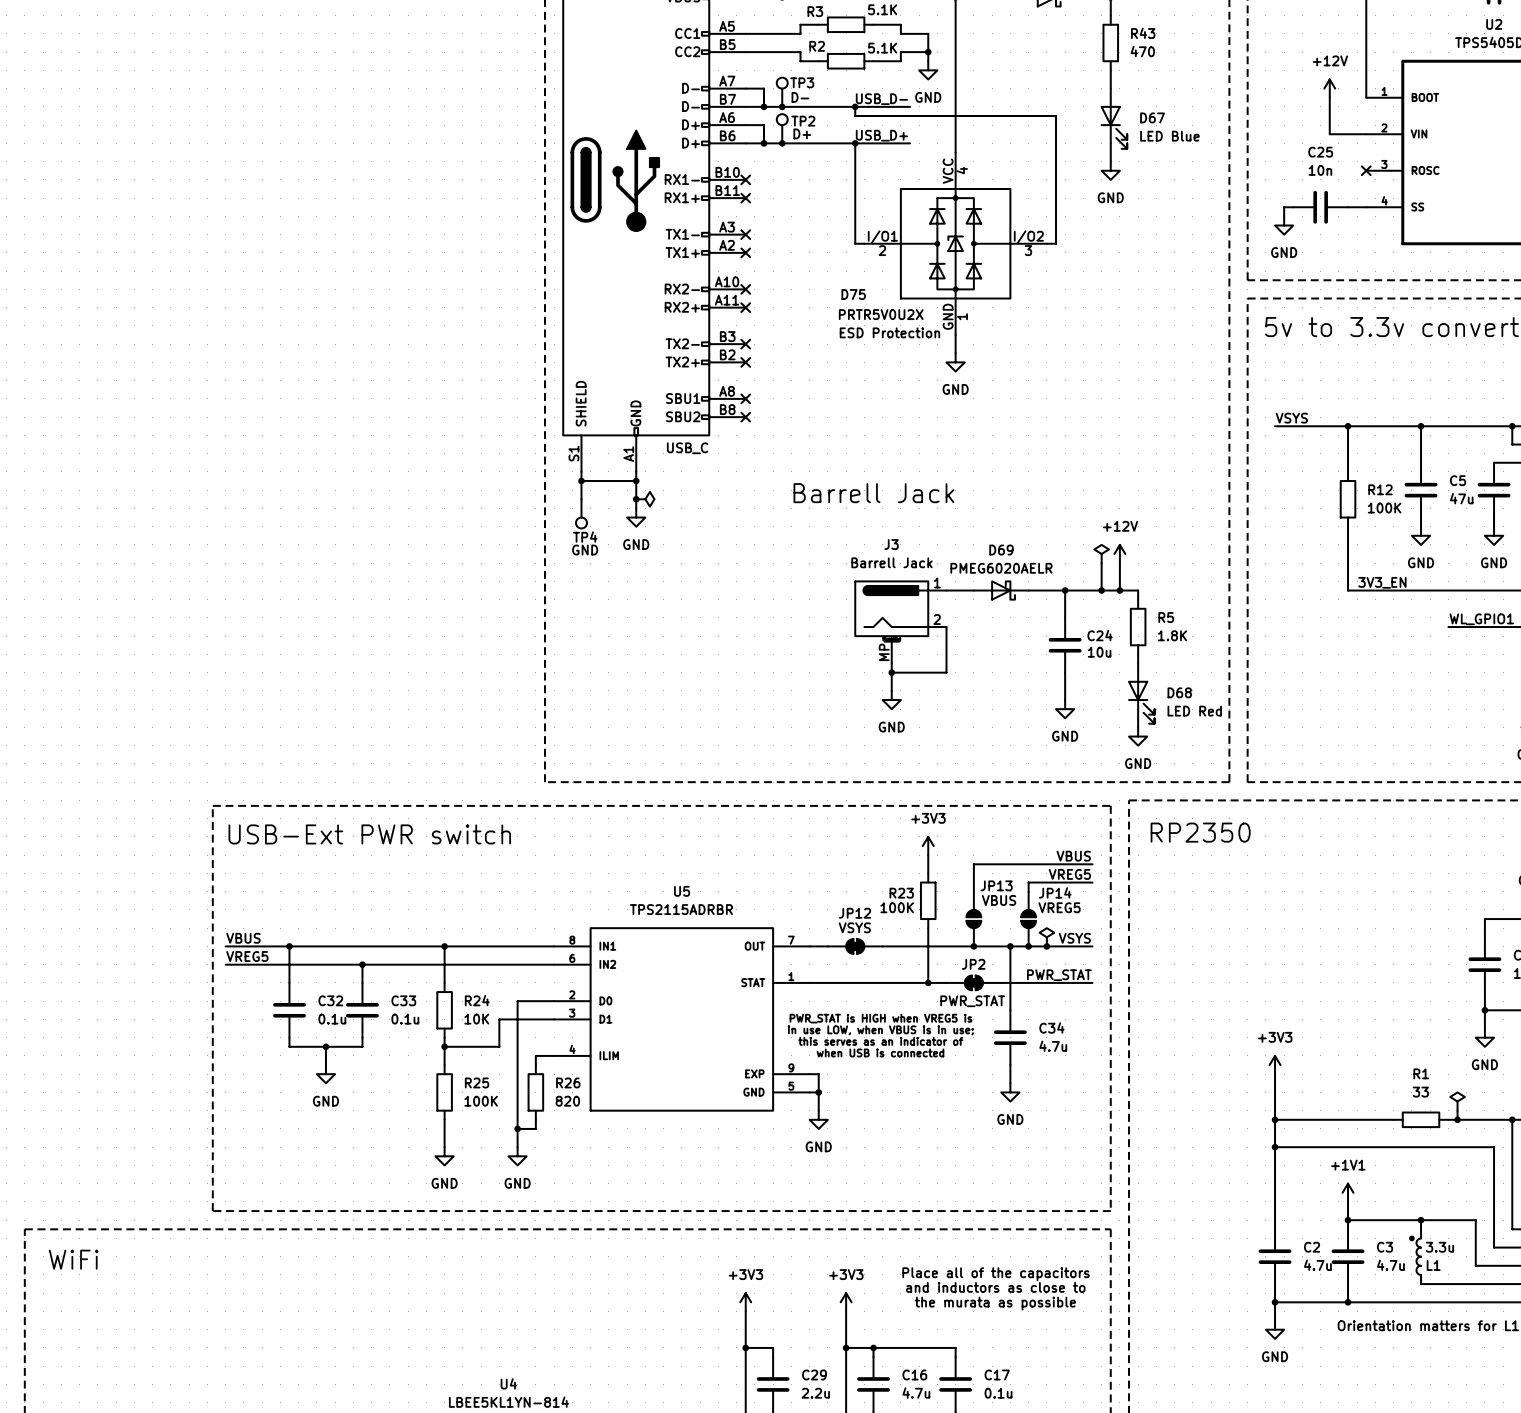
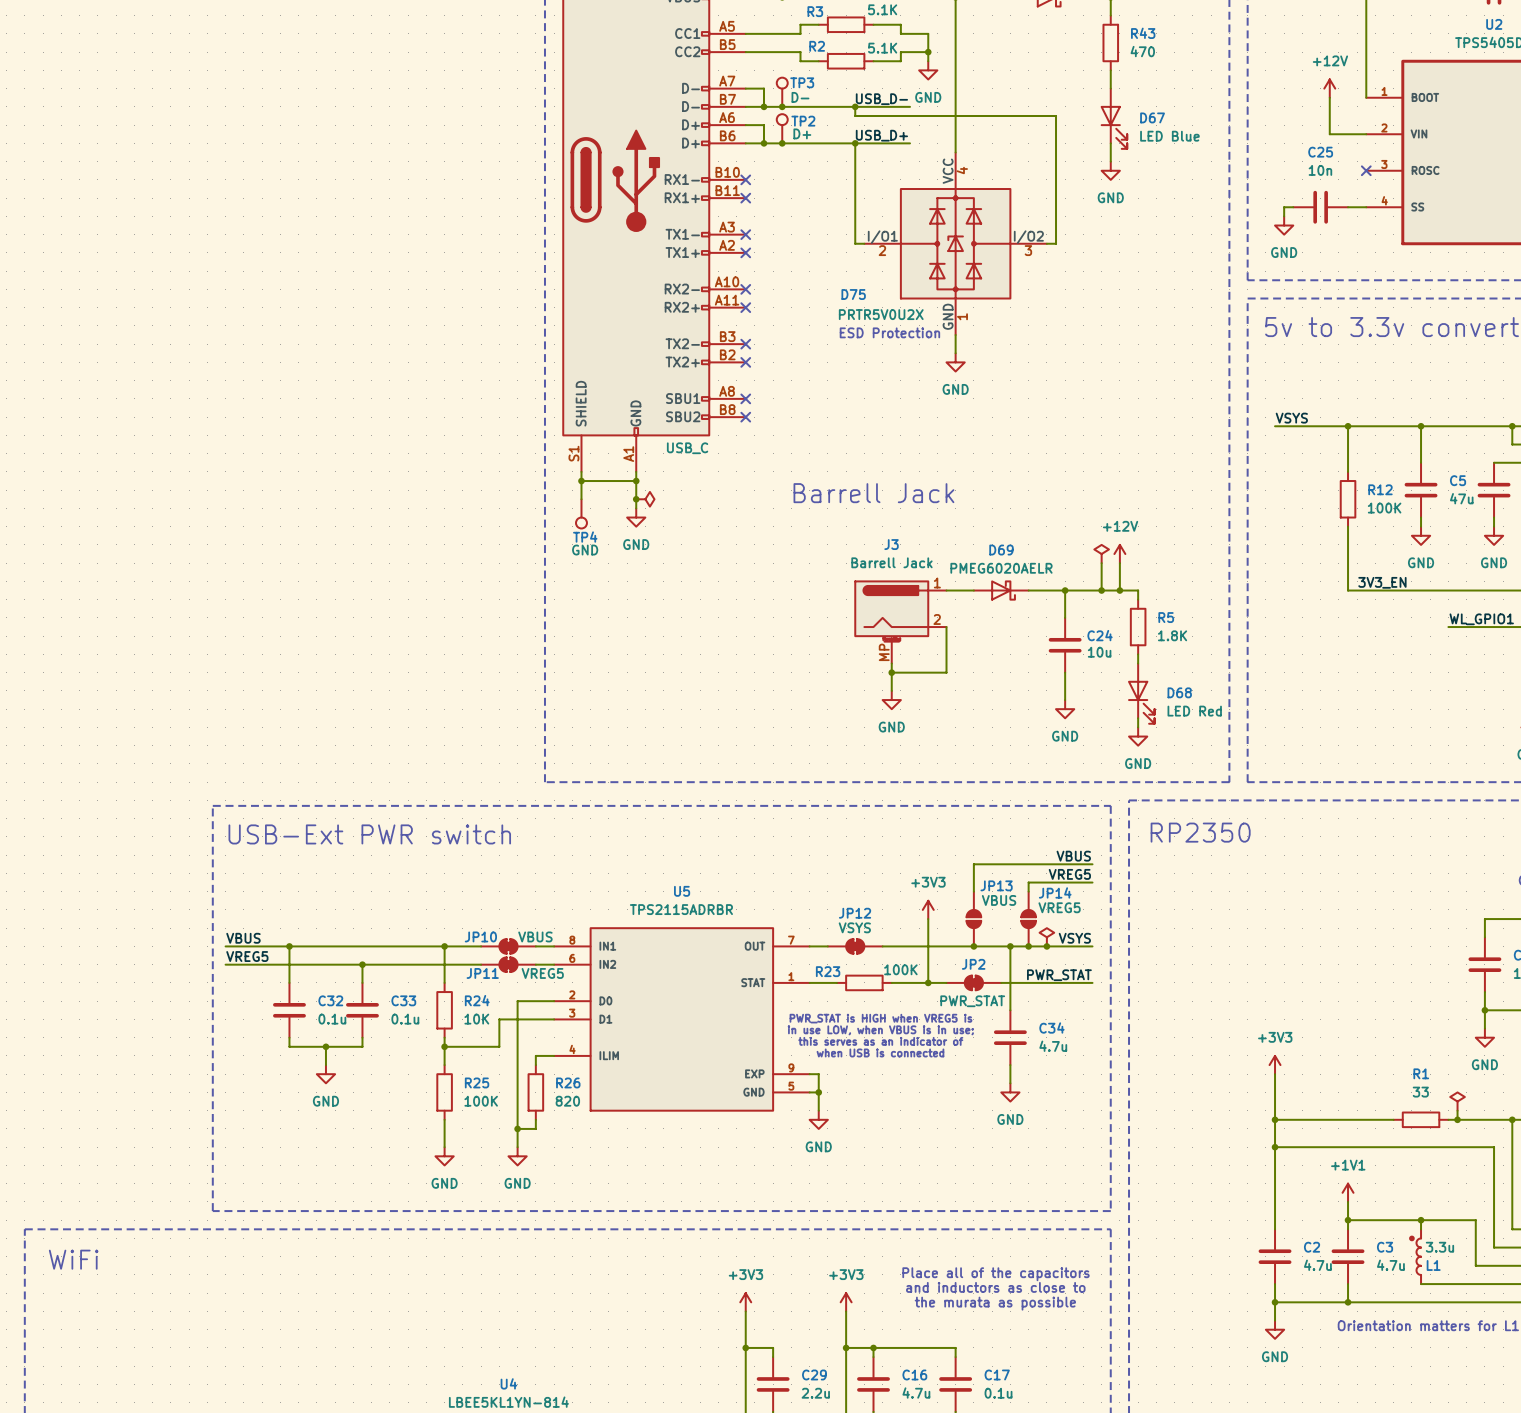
power symbol position: +3V3 (928, 846) -> +3V3 (928, 909)
wire: (928, 855) (928, 873) -> none
R23 rotation: 0° (928, 900) -> 90° clockwise (864, 982)
R23 position: (928, 900) -> (864, 982)
R23 value position: 100K (897, 907) -> 100K (900, 969)
JP10: none -> VBUS (508, 946)
JP11: none -> VREG5 (508, 964)
wire: (837, 982) (891, 982) -> none

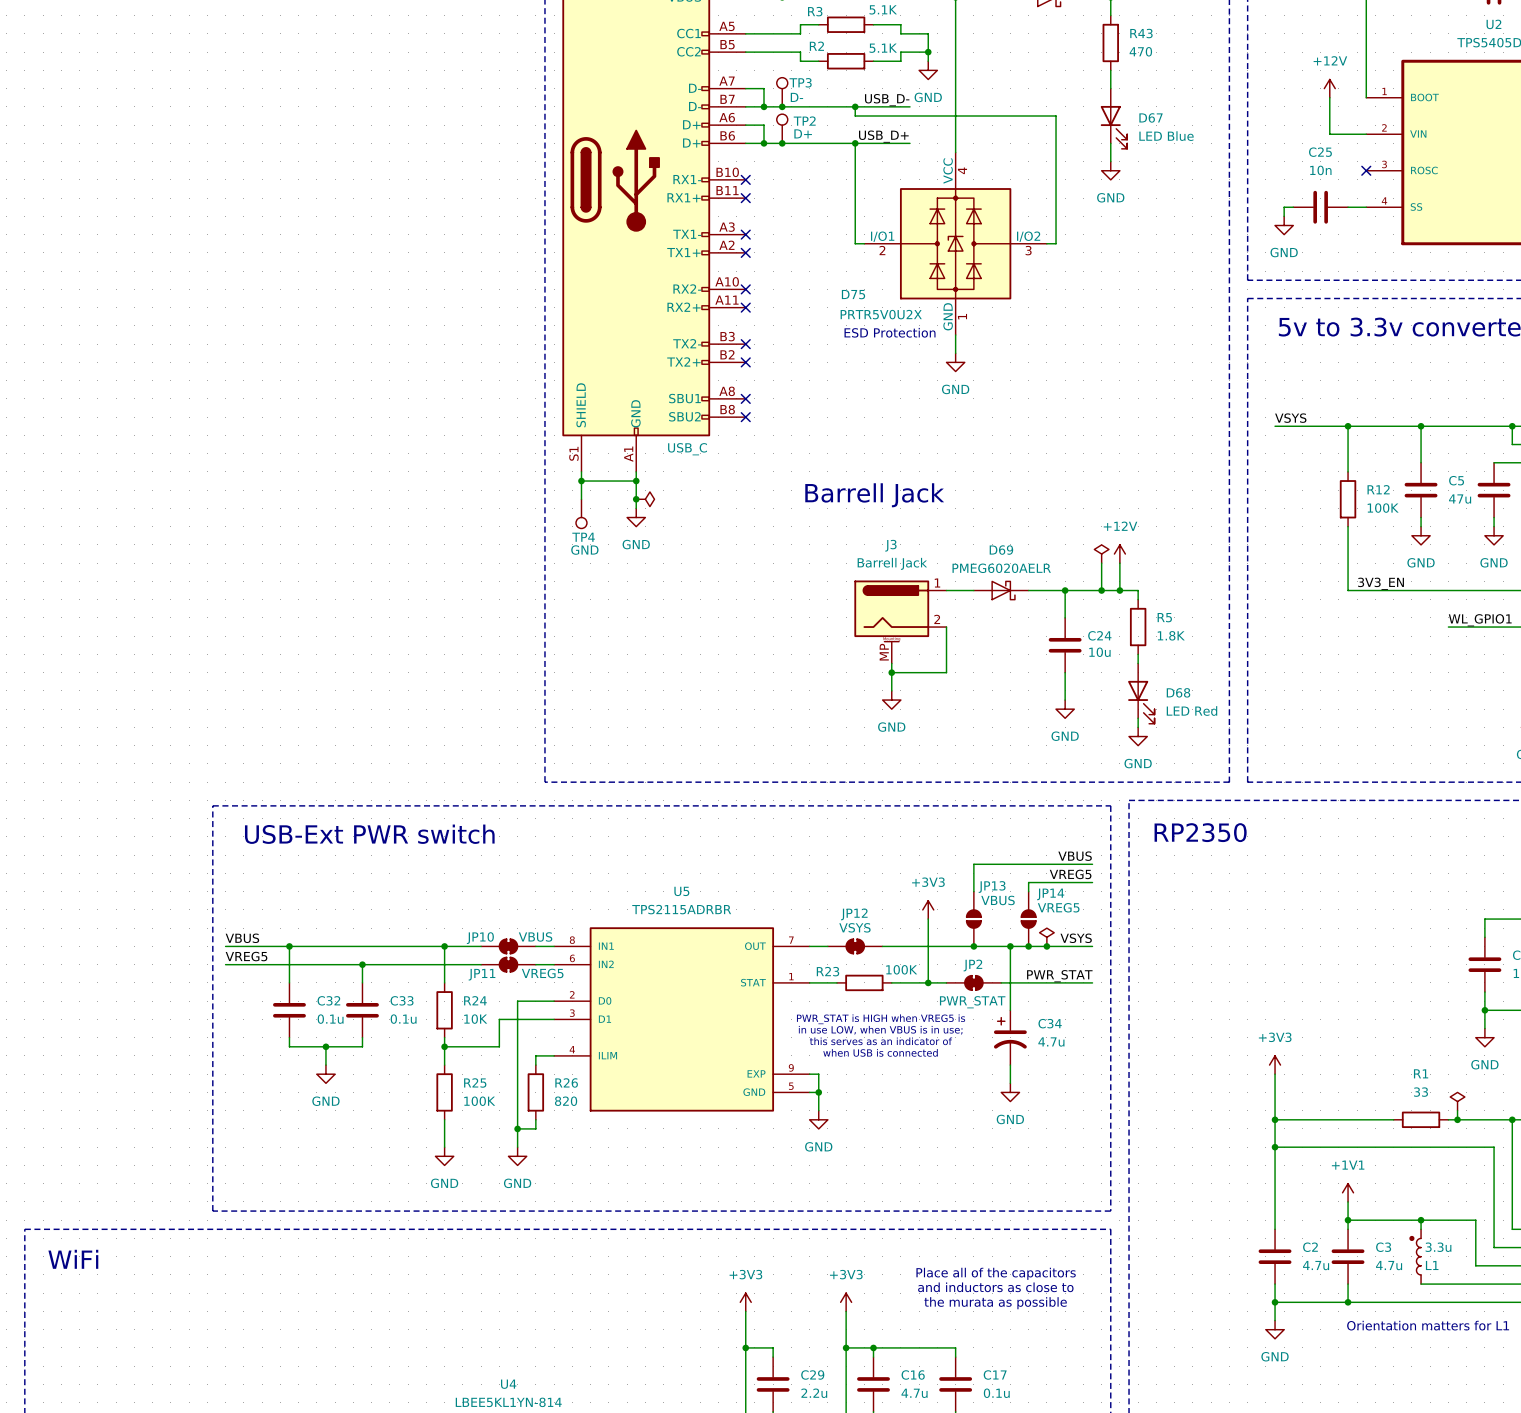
C34 symbol: [993, 1010, 1027, 1066] -> [993, 1010, 1027, 1066]

